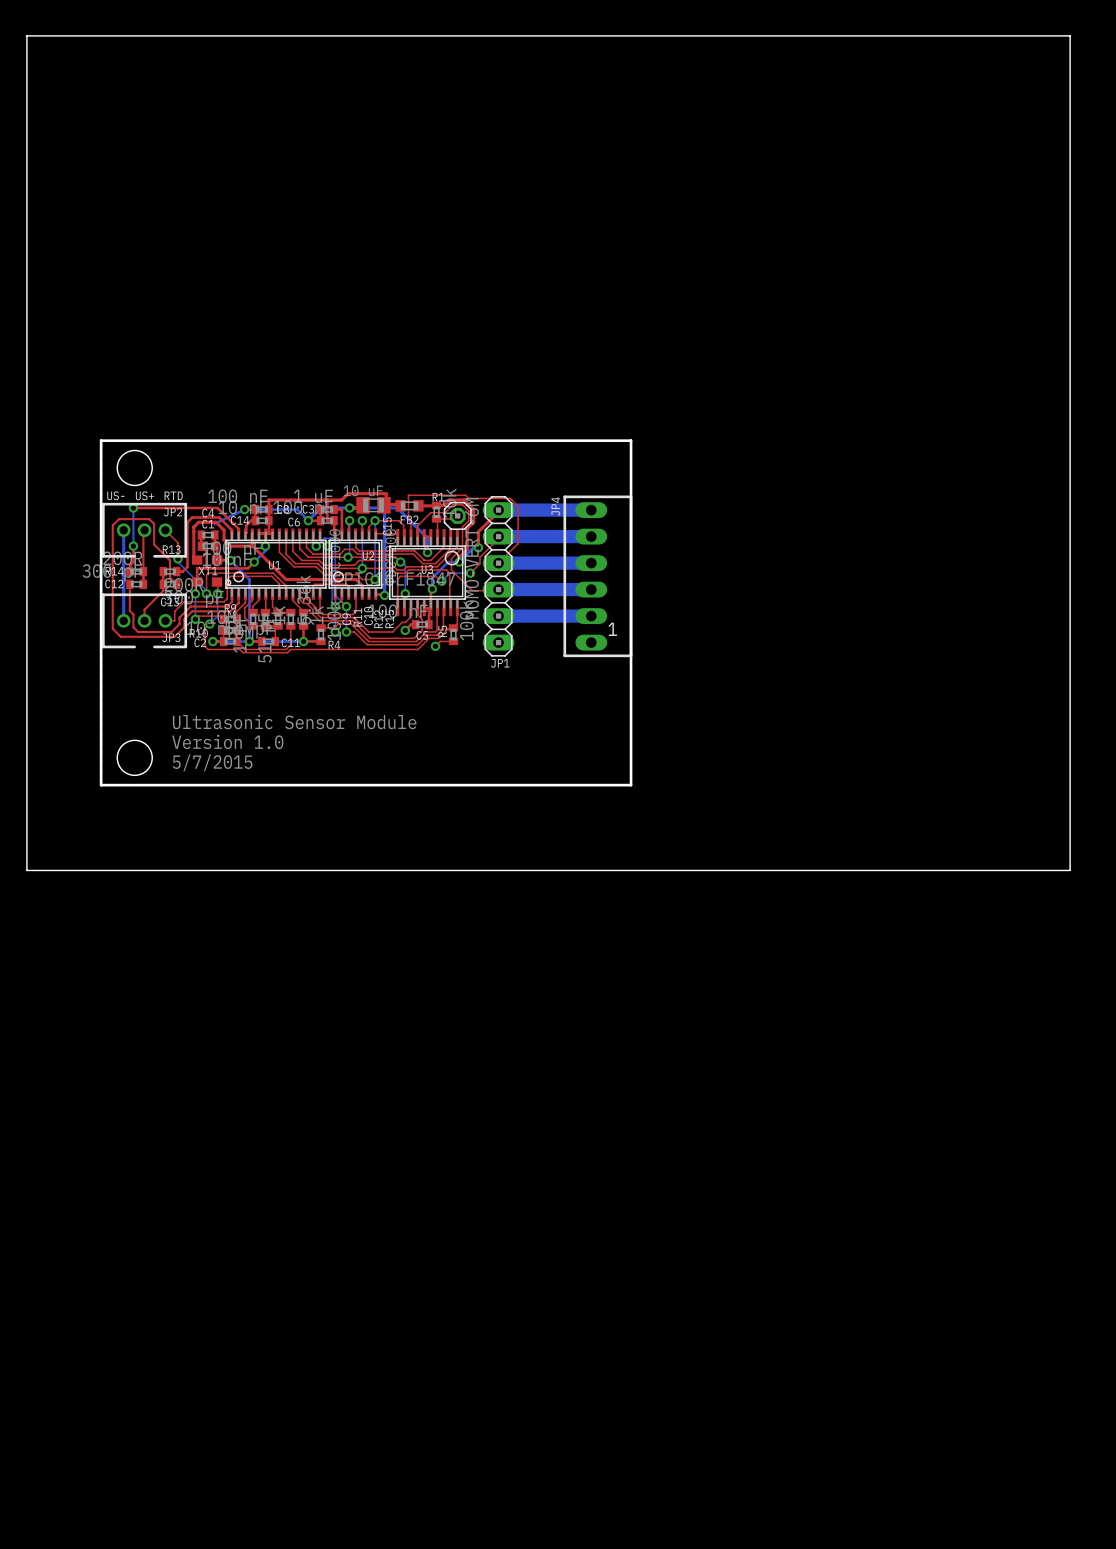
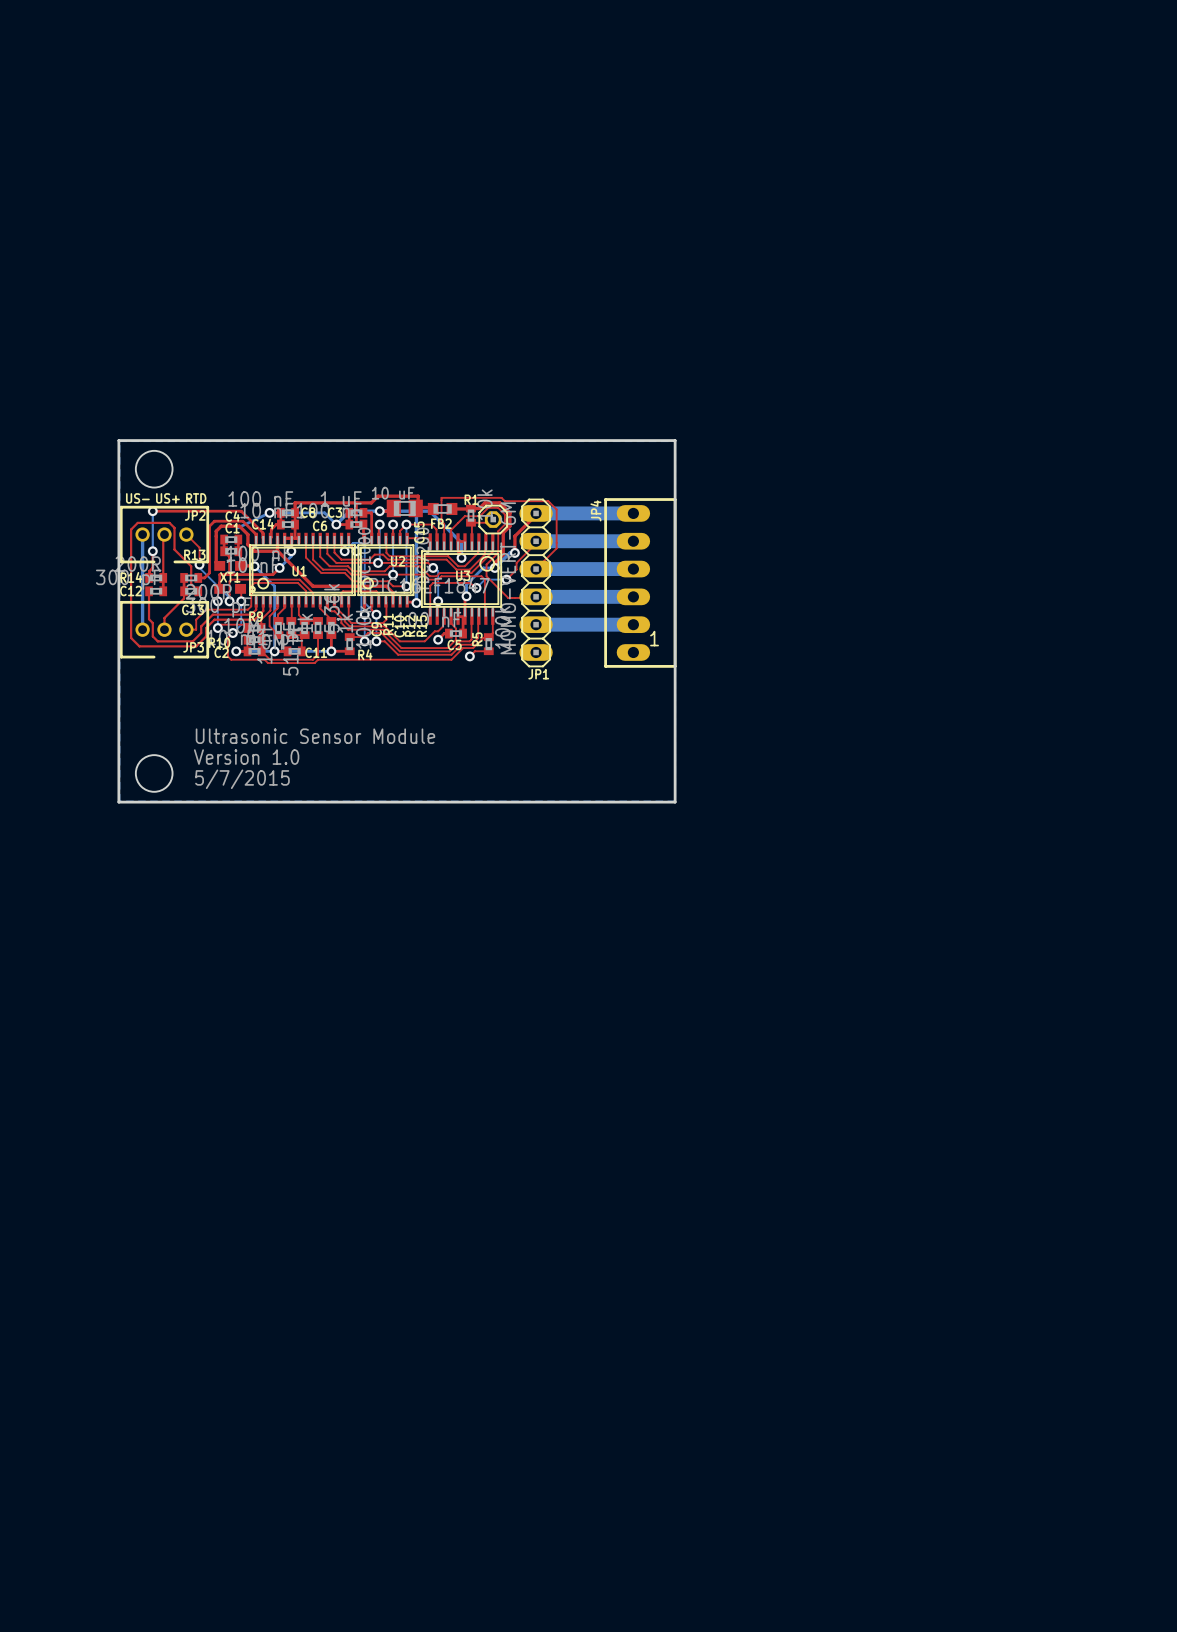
board edge: (26, 35) (1070, 35) (1070, 870) (26, 870) (26, 35) -> none

